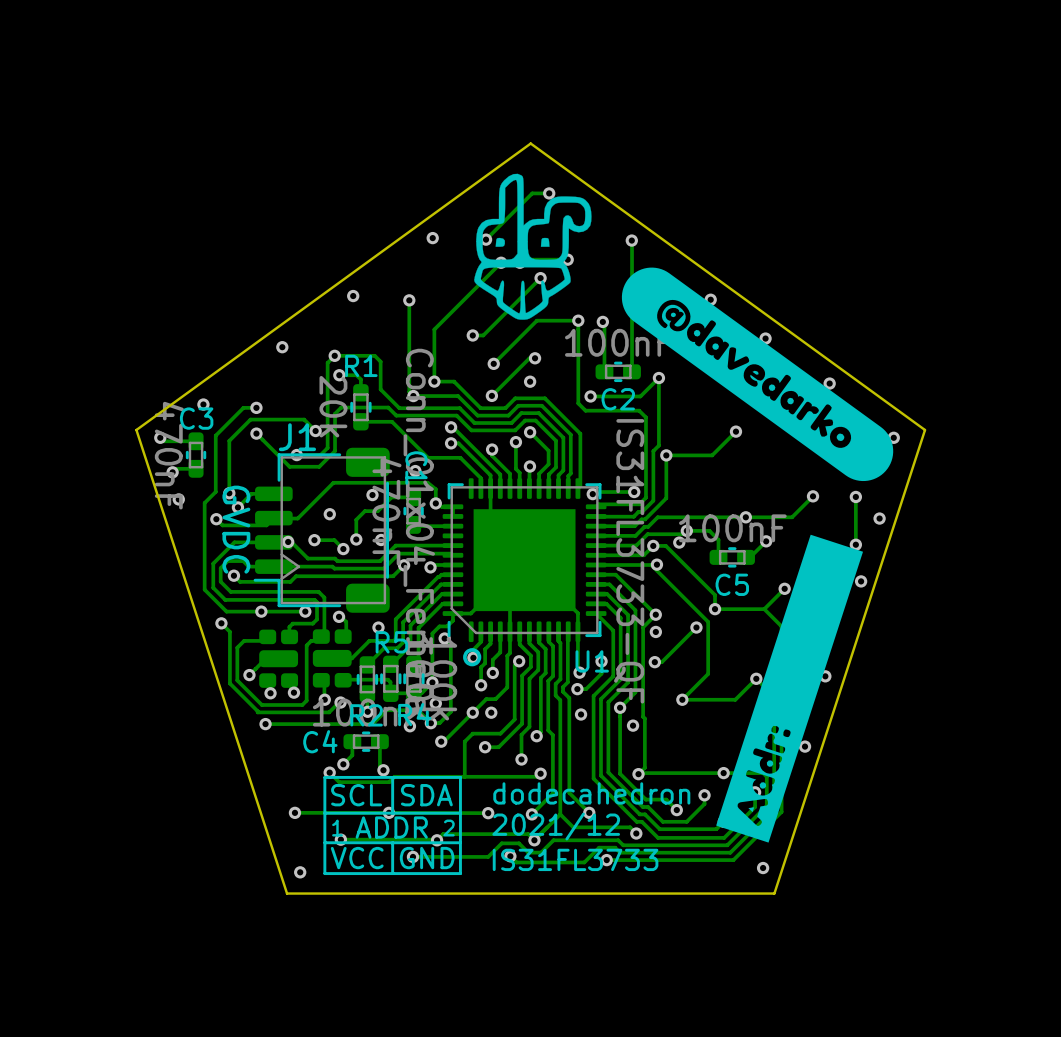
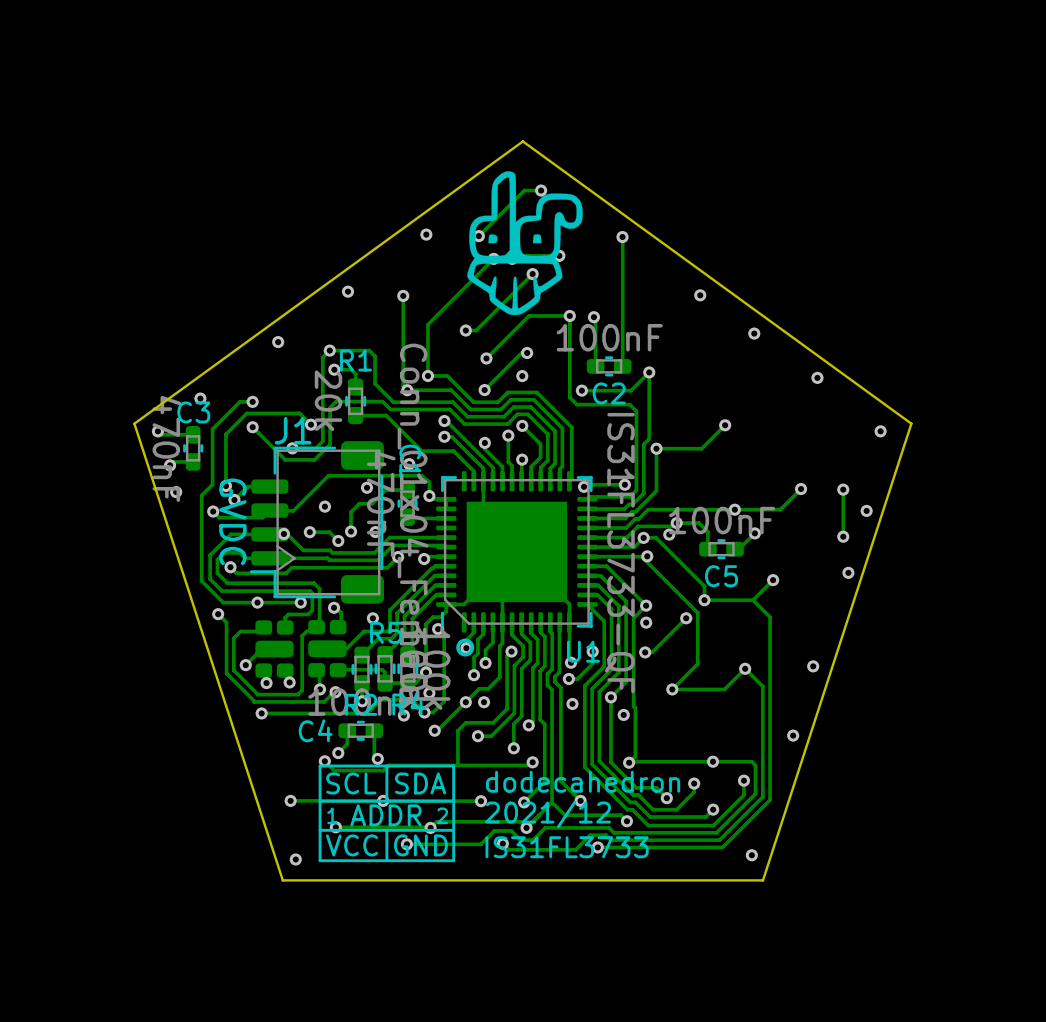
drawing: [621, 267, 894, 482] -> none
drawing: [716, 534, 864, 843] -> none

